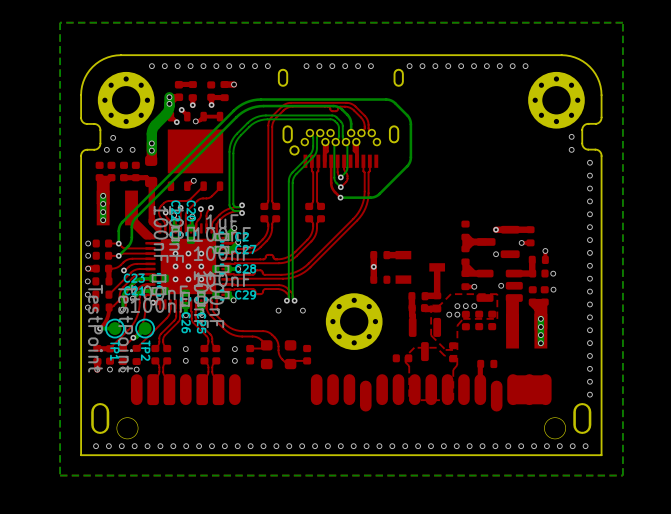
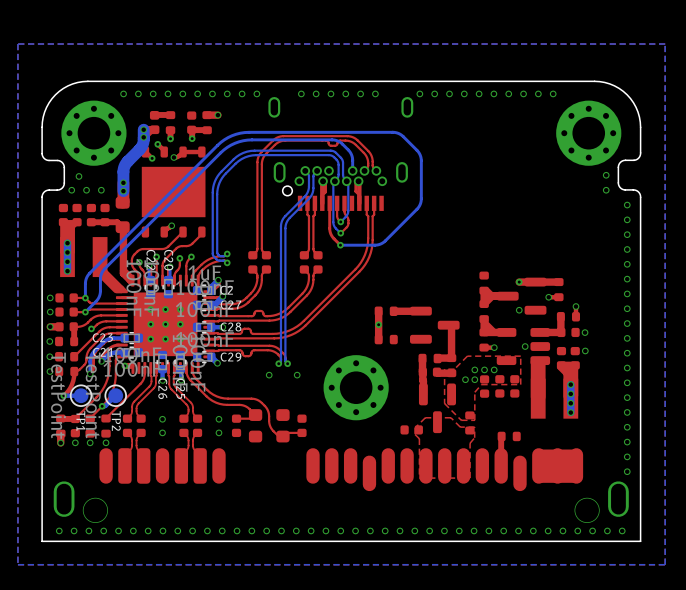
part footprint: [395, 250, 446, 284] -> [410, 306, 460, 344]

